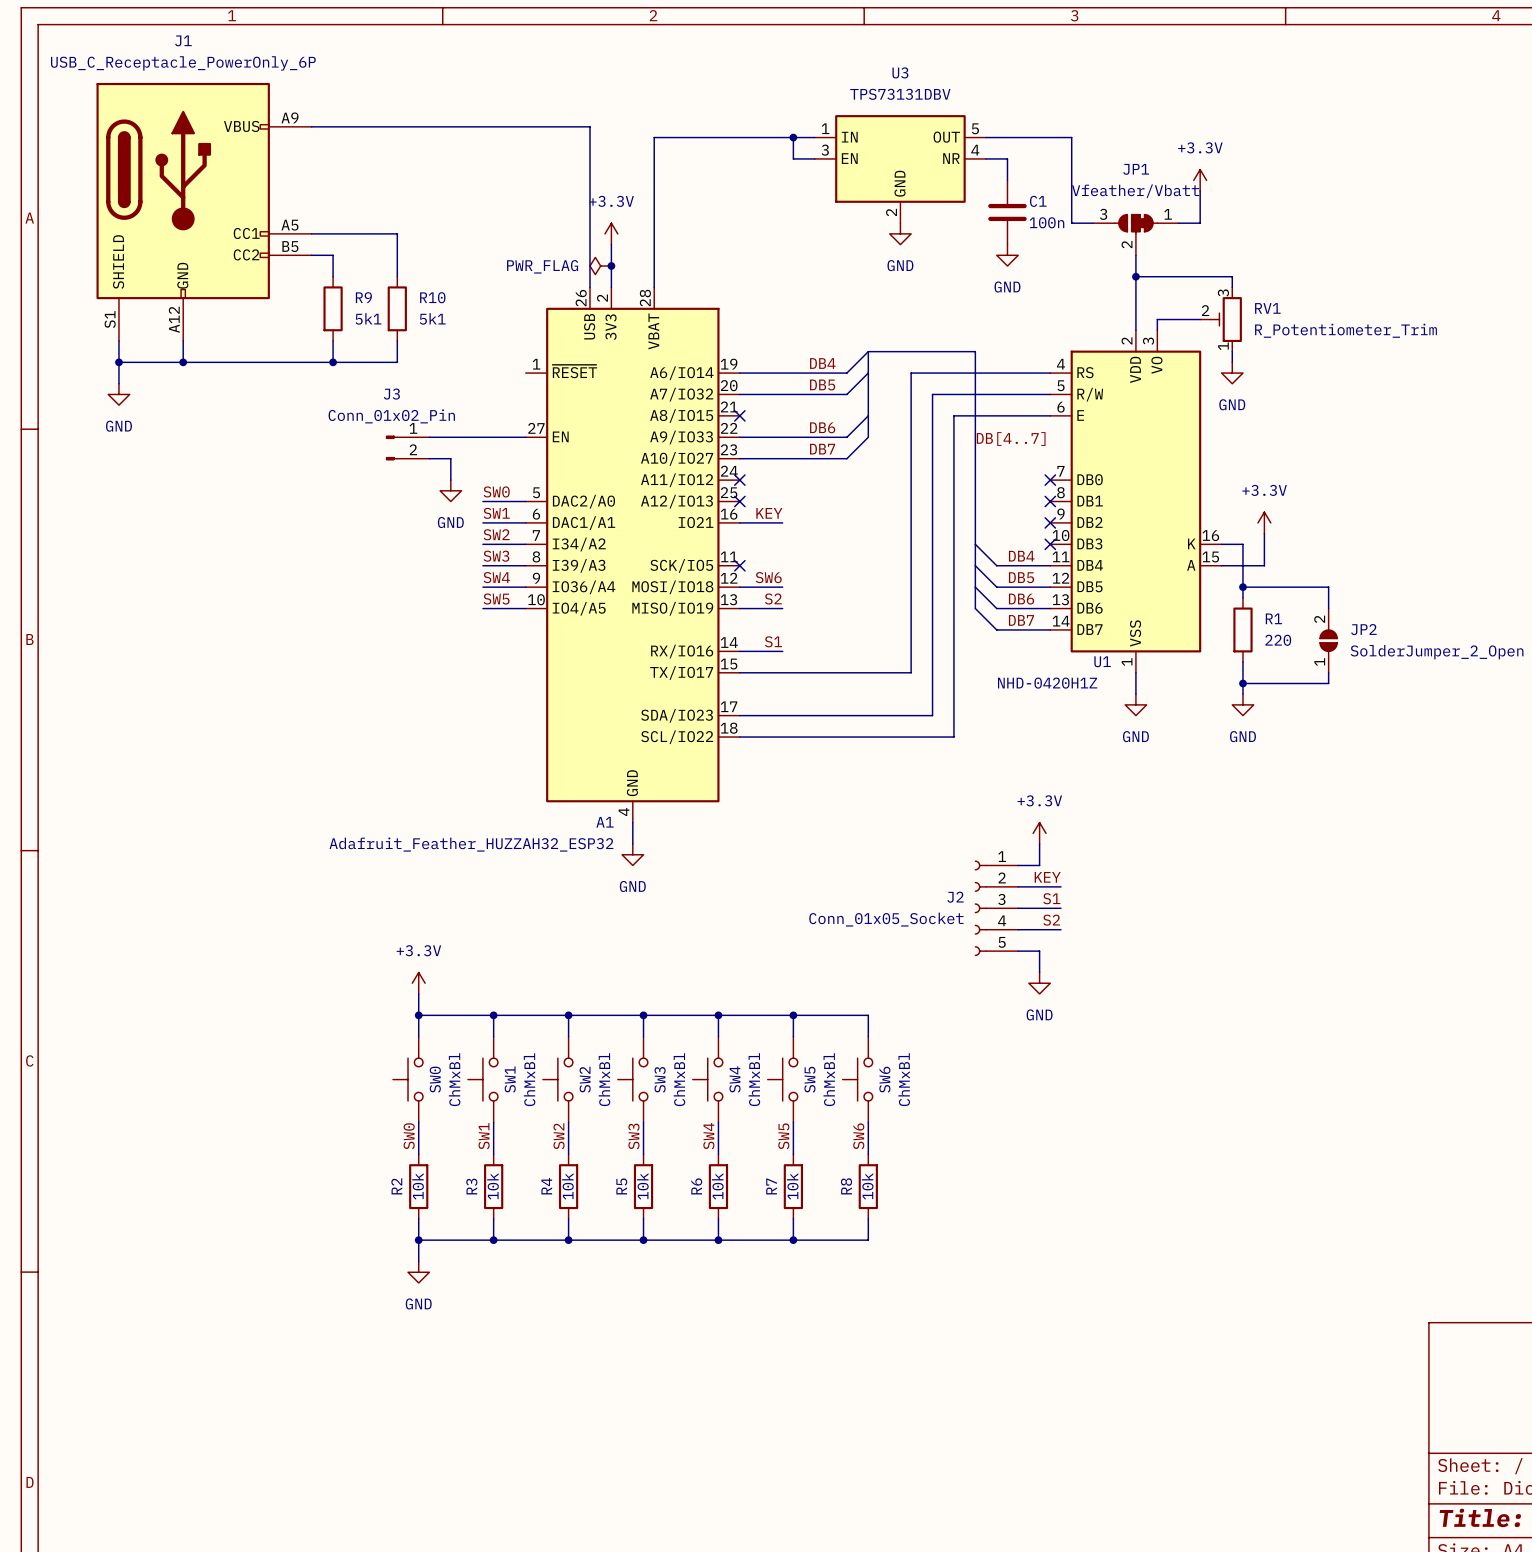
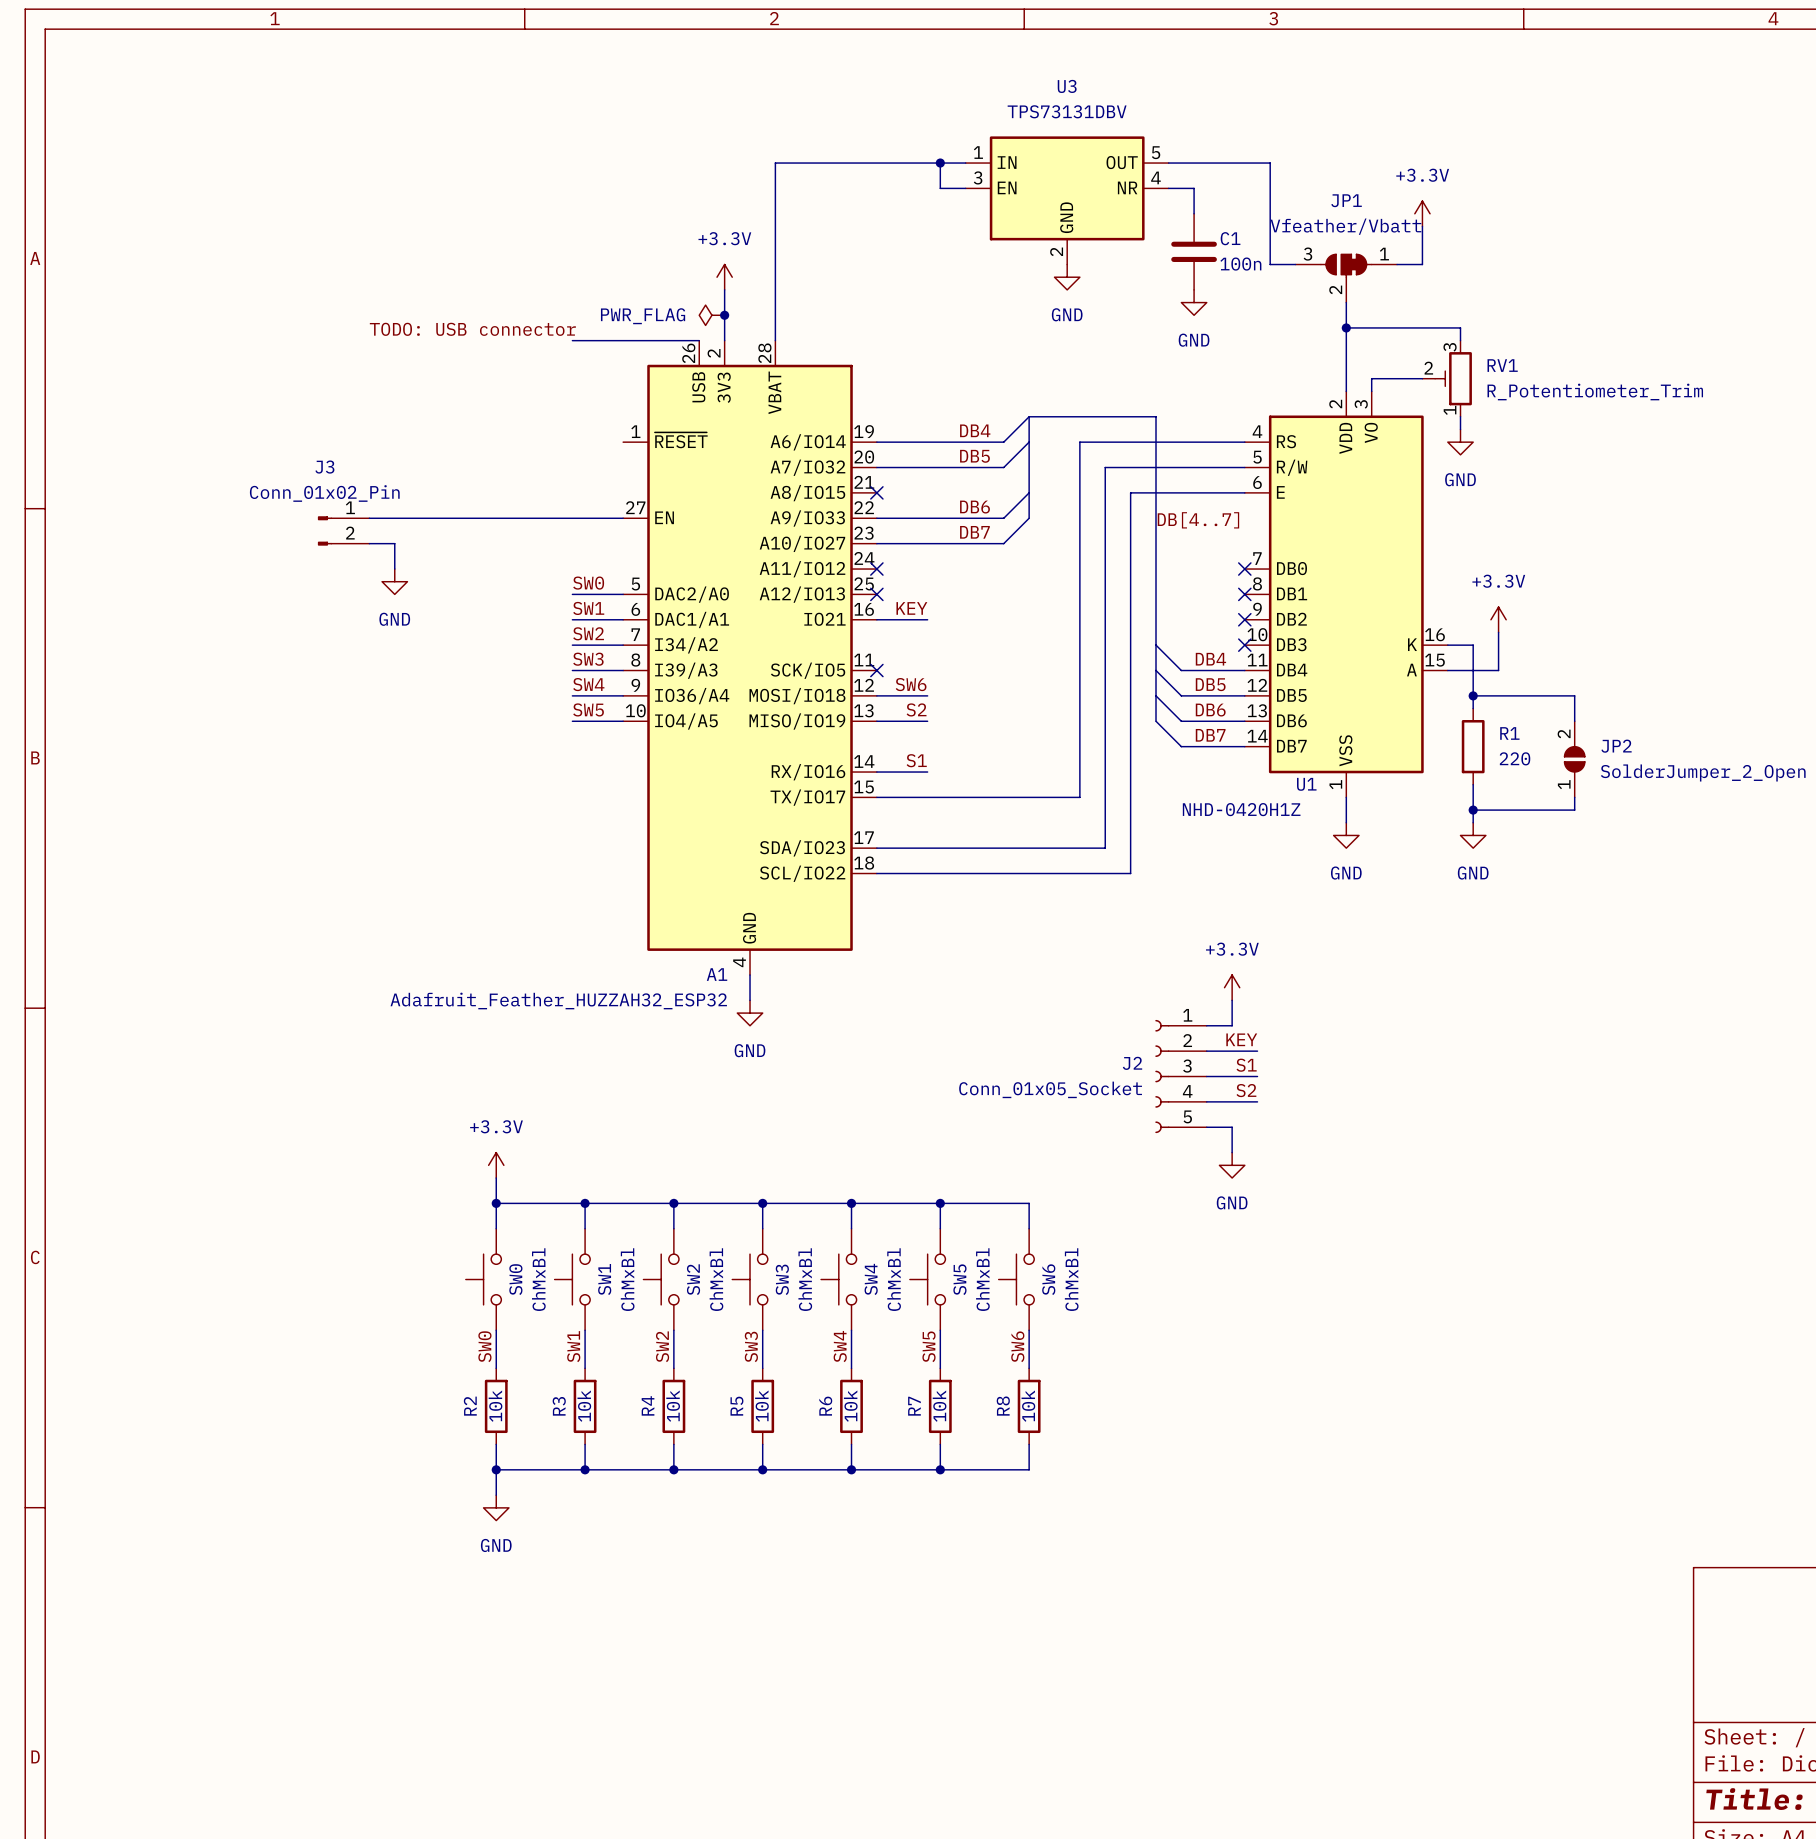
wire: (311, 126) (589, 126) (589, 287) -> (572, 340) (699, 340)
J1: USB_C_Receptacle_PowerOnly_6P (204, 211) -> none
wire: (311, 233) (397, 233) (397, 276) -> none
wire: (311, 255) (333, 255) (333, 276) -> none
label: none -> TODO: USB connector (472, 329)
R9: 5k1 (333, 308) -> none
R10: 5k1 (397, 308) -> none
wire: (118, 340) (118, 383) -> none
wire: (183, 340) (183, 362) -> none
wire: (333, 340) (333, 362) -> none
wire: (397, 340) (397, 362) (118, 362) -> none
junction: (118, 362) -> none
junction: (183, 362) -> none
junction: (333, 362) -> none
power symbol: GND (118, 394) -> none
wire: none -> (369, 518) (508, 518)
J3 position: (407, 447) -> (343, 530)
wire: (429, 458) (450, 458) (450, 480) -> (369, 543) (394, 543) (394, 569)
power symbol: none -> GND (394, 581)
power symbol: GND (450, 490) -> none

